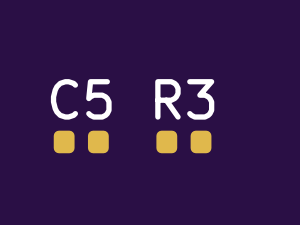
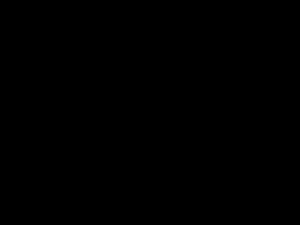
C5: (81, 141) -> none
R3: (183, 141) -> none

